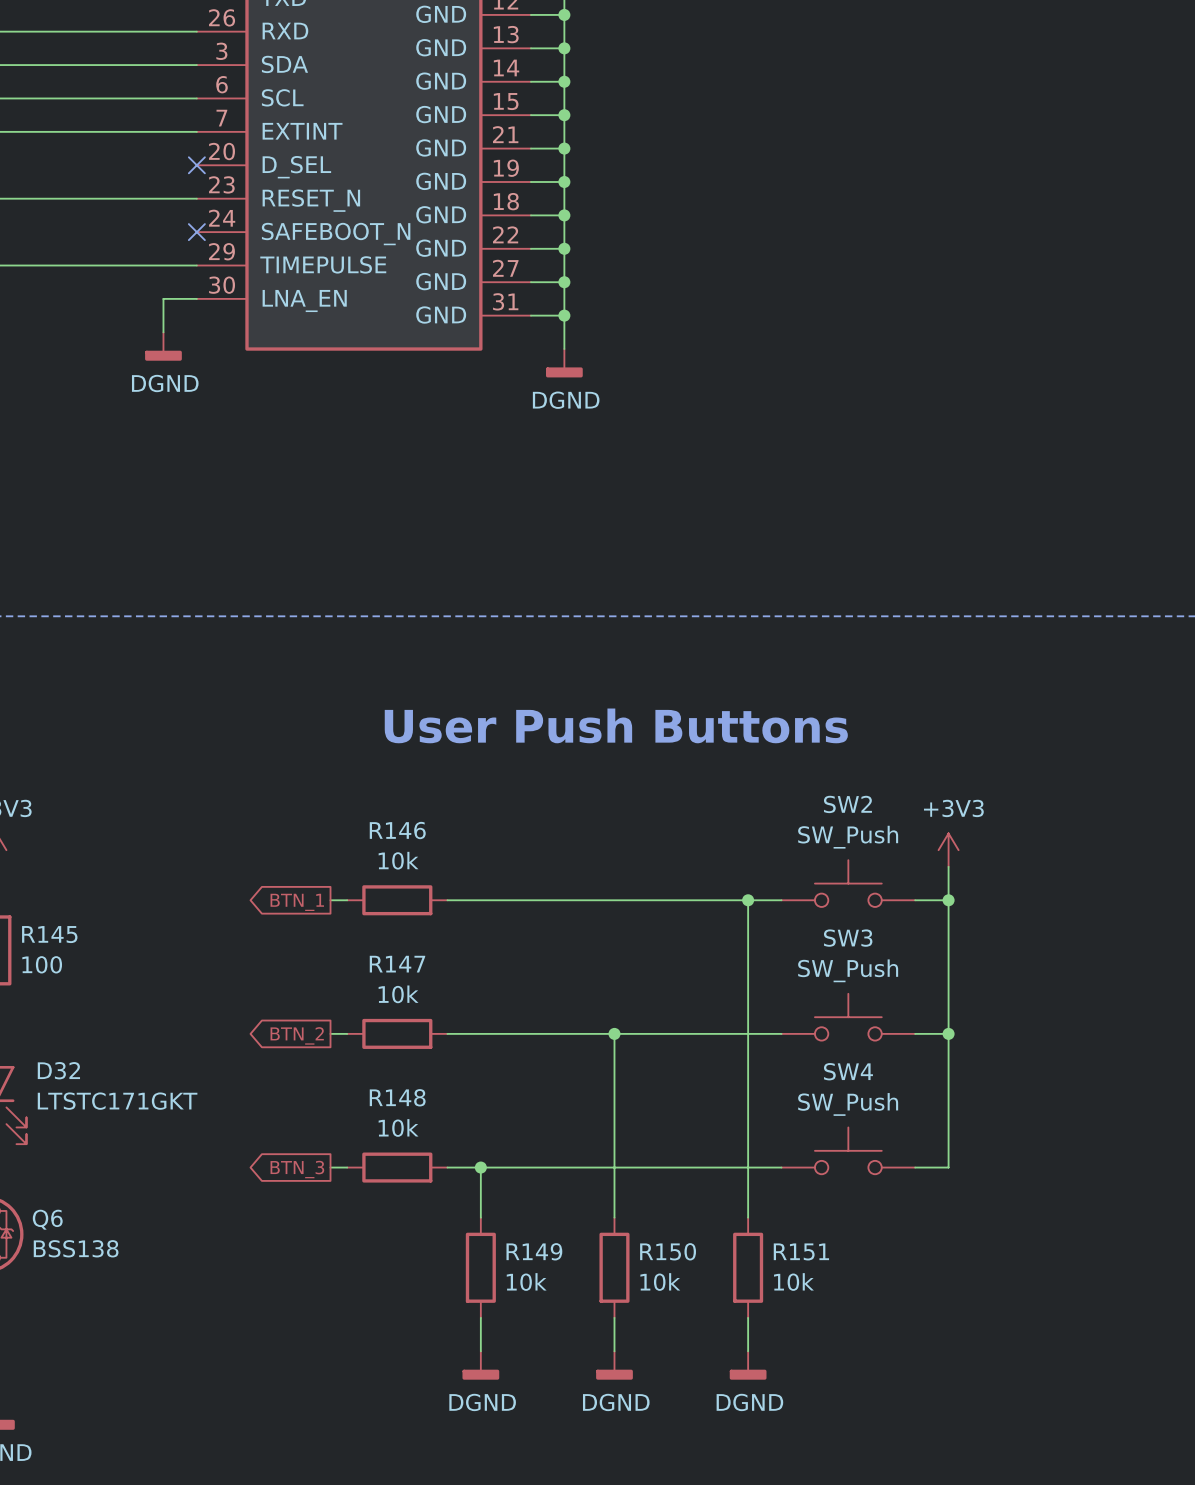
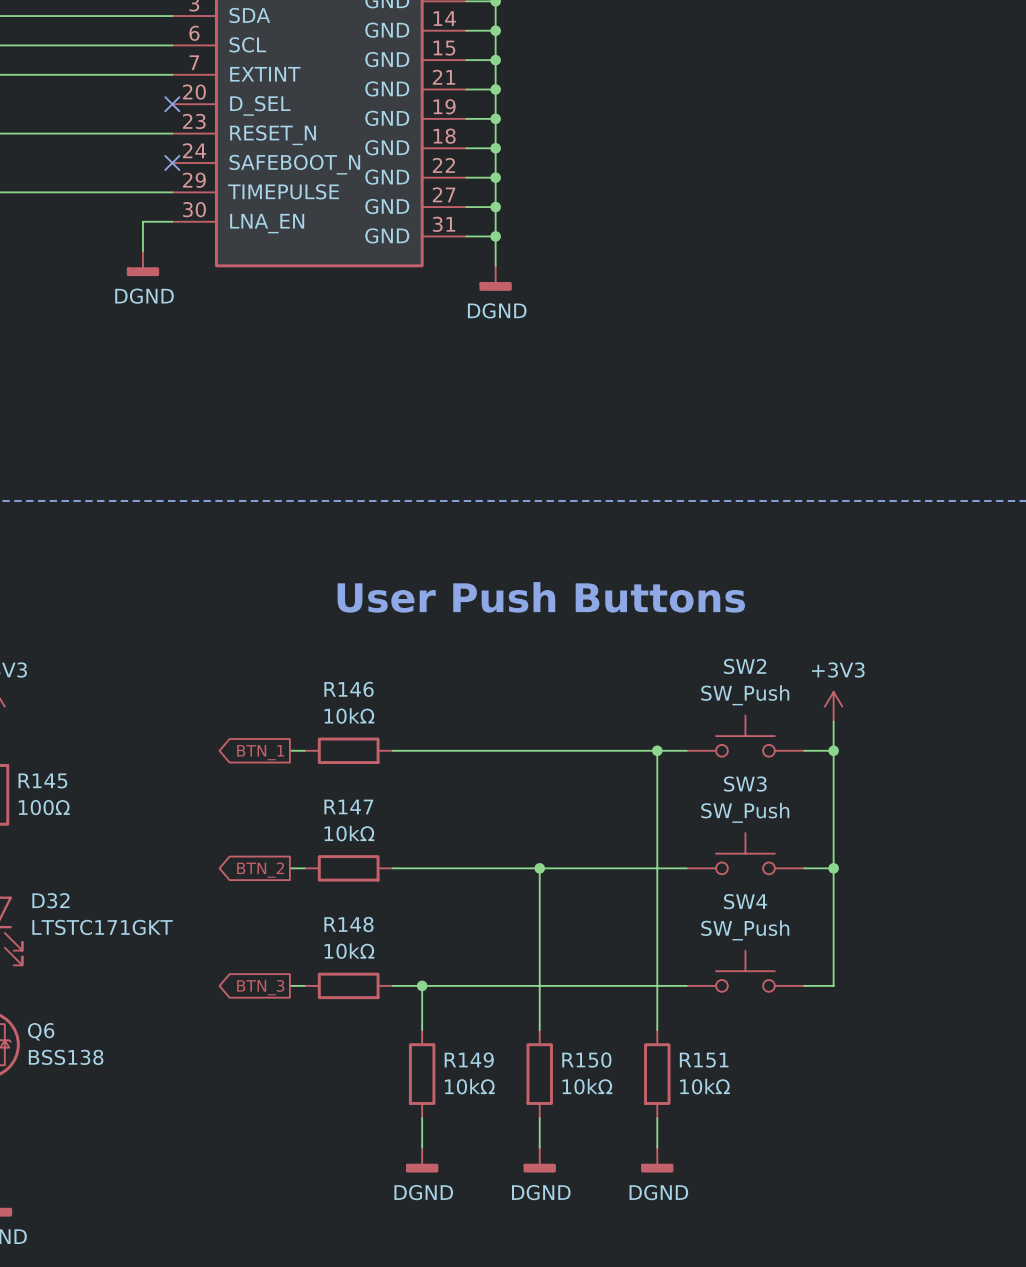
R146 value: 10k (398, 860) -> 10kΩ (349, 715)
R145 value: 100 (42, 964) -> 100Ω (44, 807)
R147 value: 10k (398, 994) -> 10kΩ (349, 833)
R148 value: 10k (398, 1127) -> 10kΩ (349, 951)
R149 value: 10k (526, 1281) -> 10kΩ (469, 1086)
R150 value: 10k (660, 1281) -> 10kΩ (587, 1086)
R151 value: 10k (793, 1281) -> 10kΩ (704, 1086)

